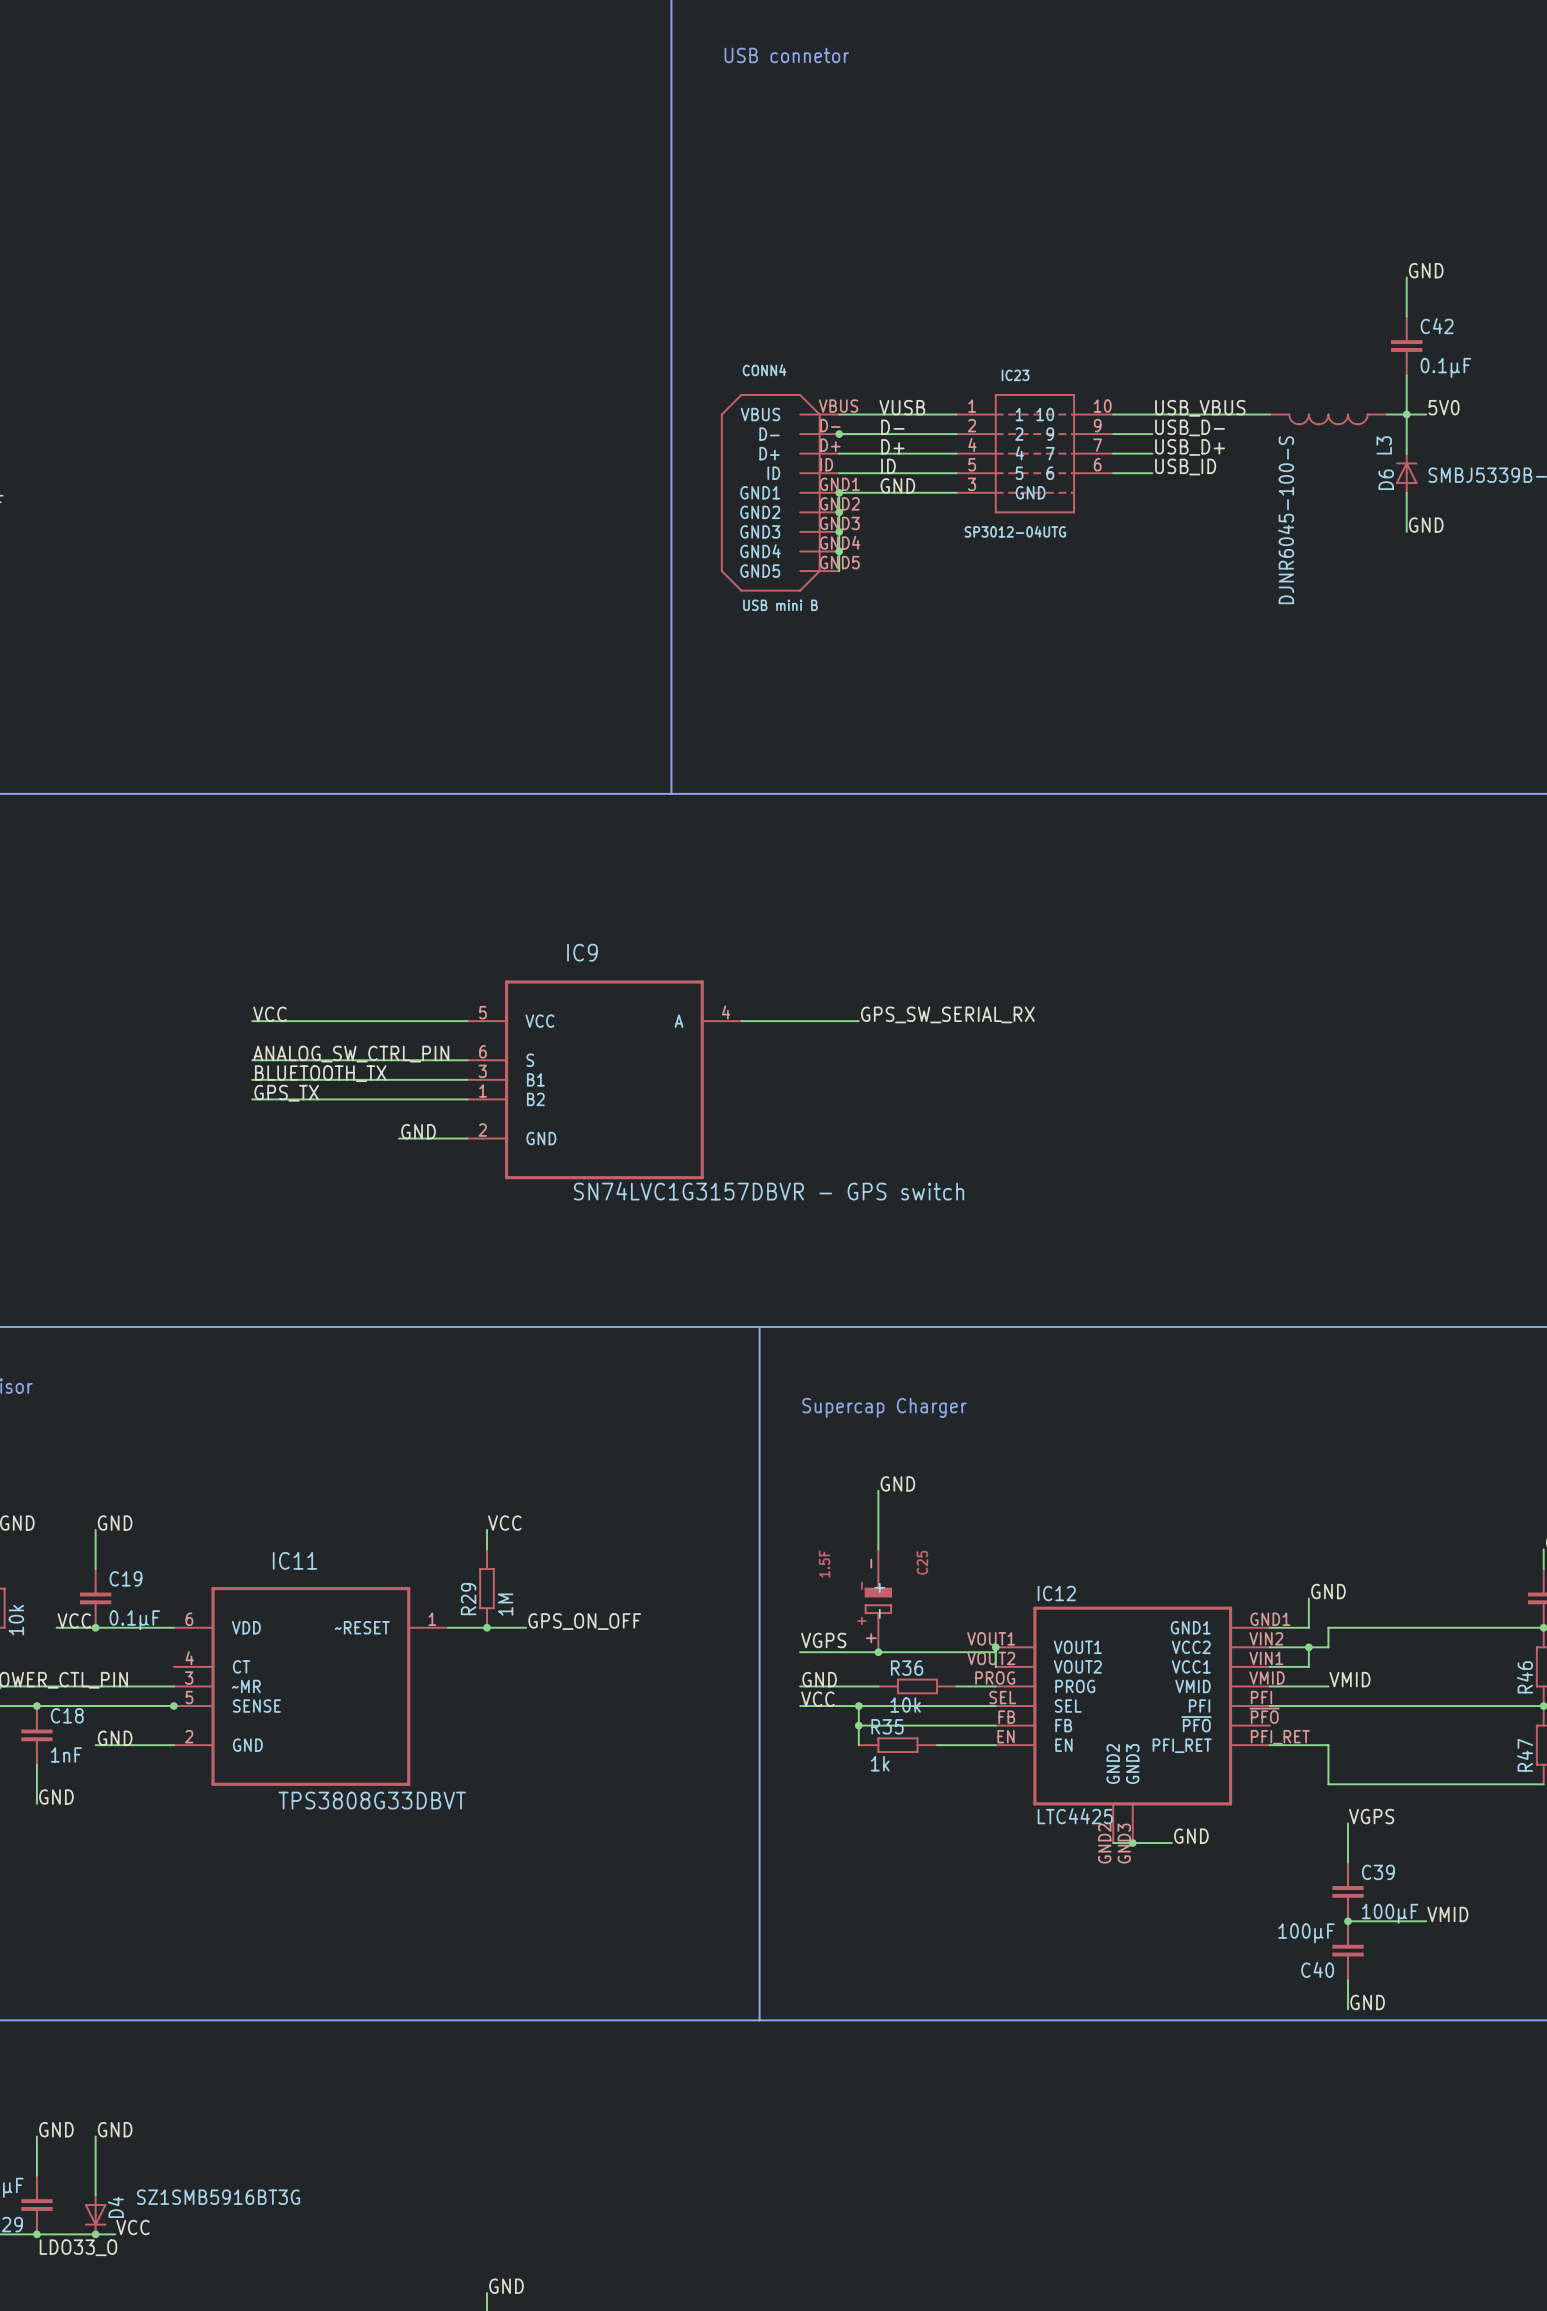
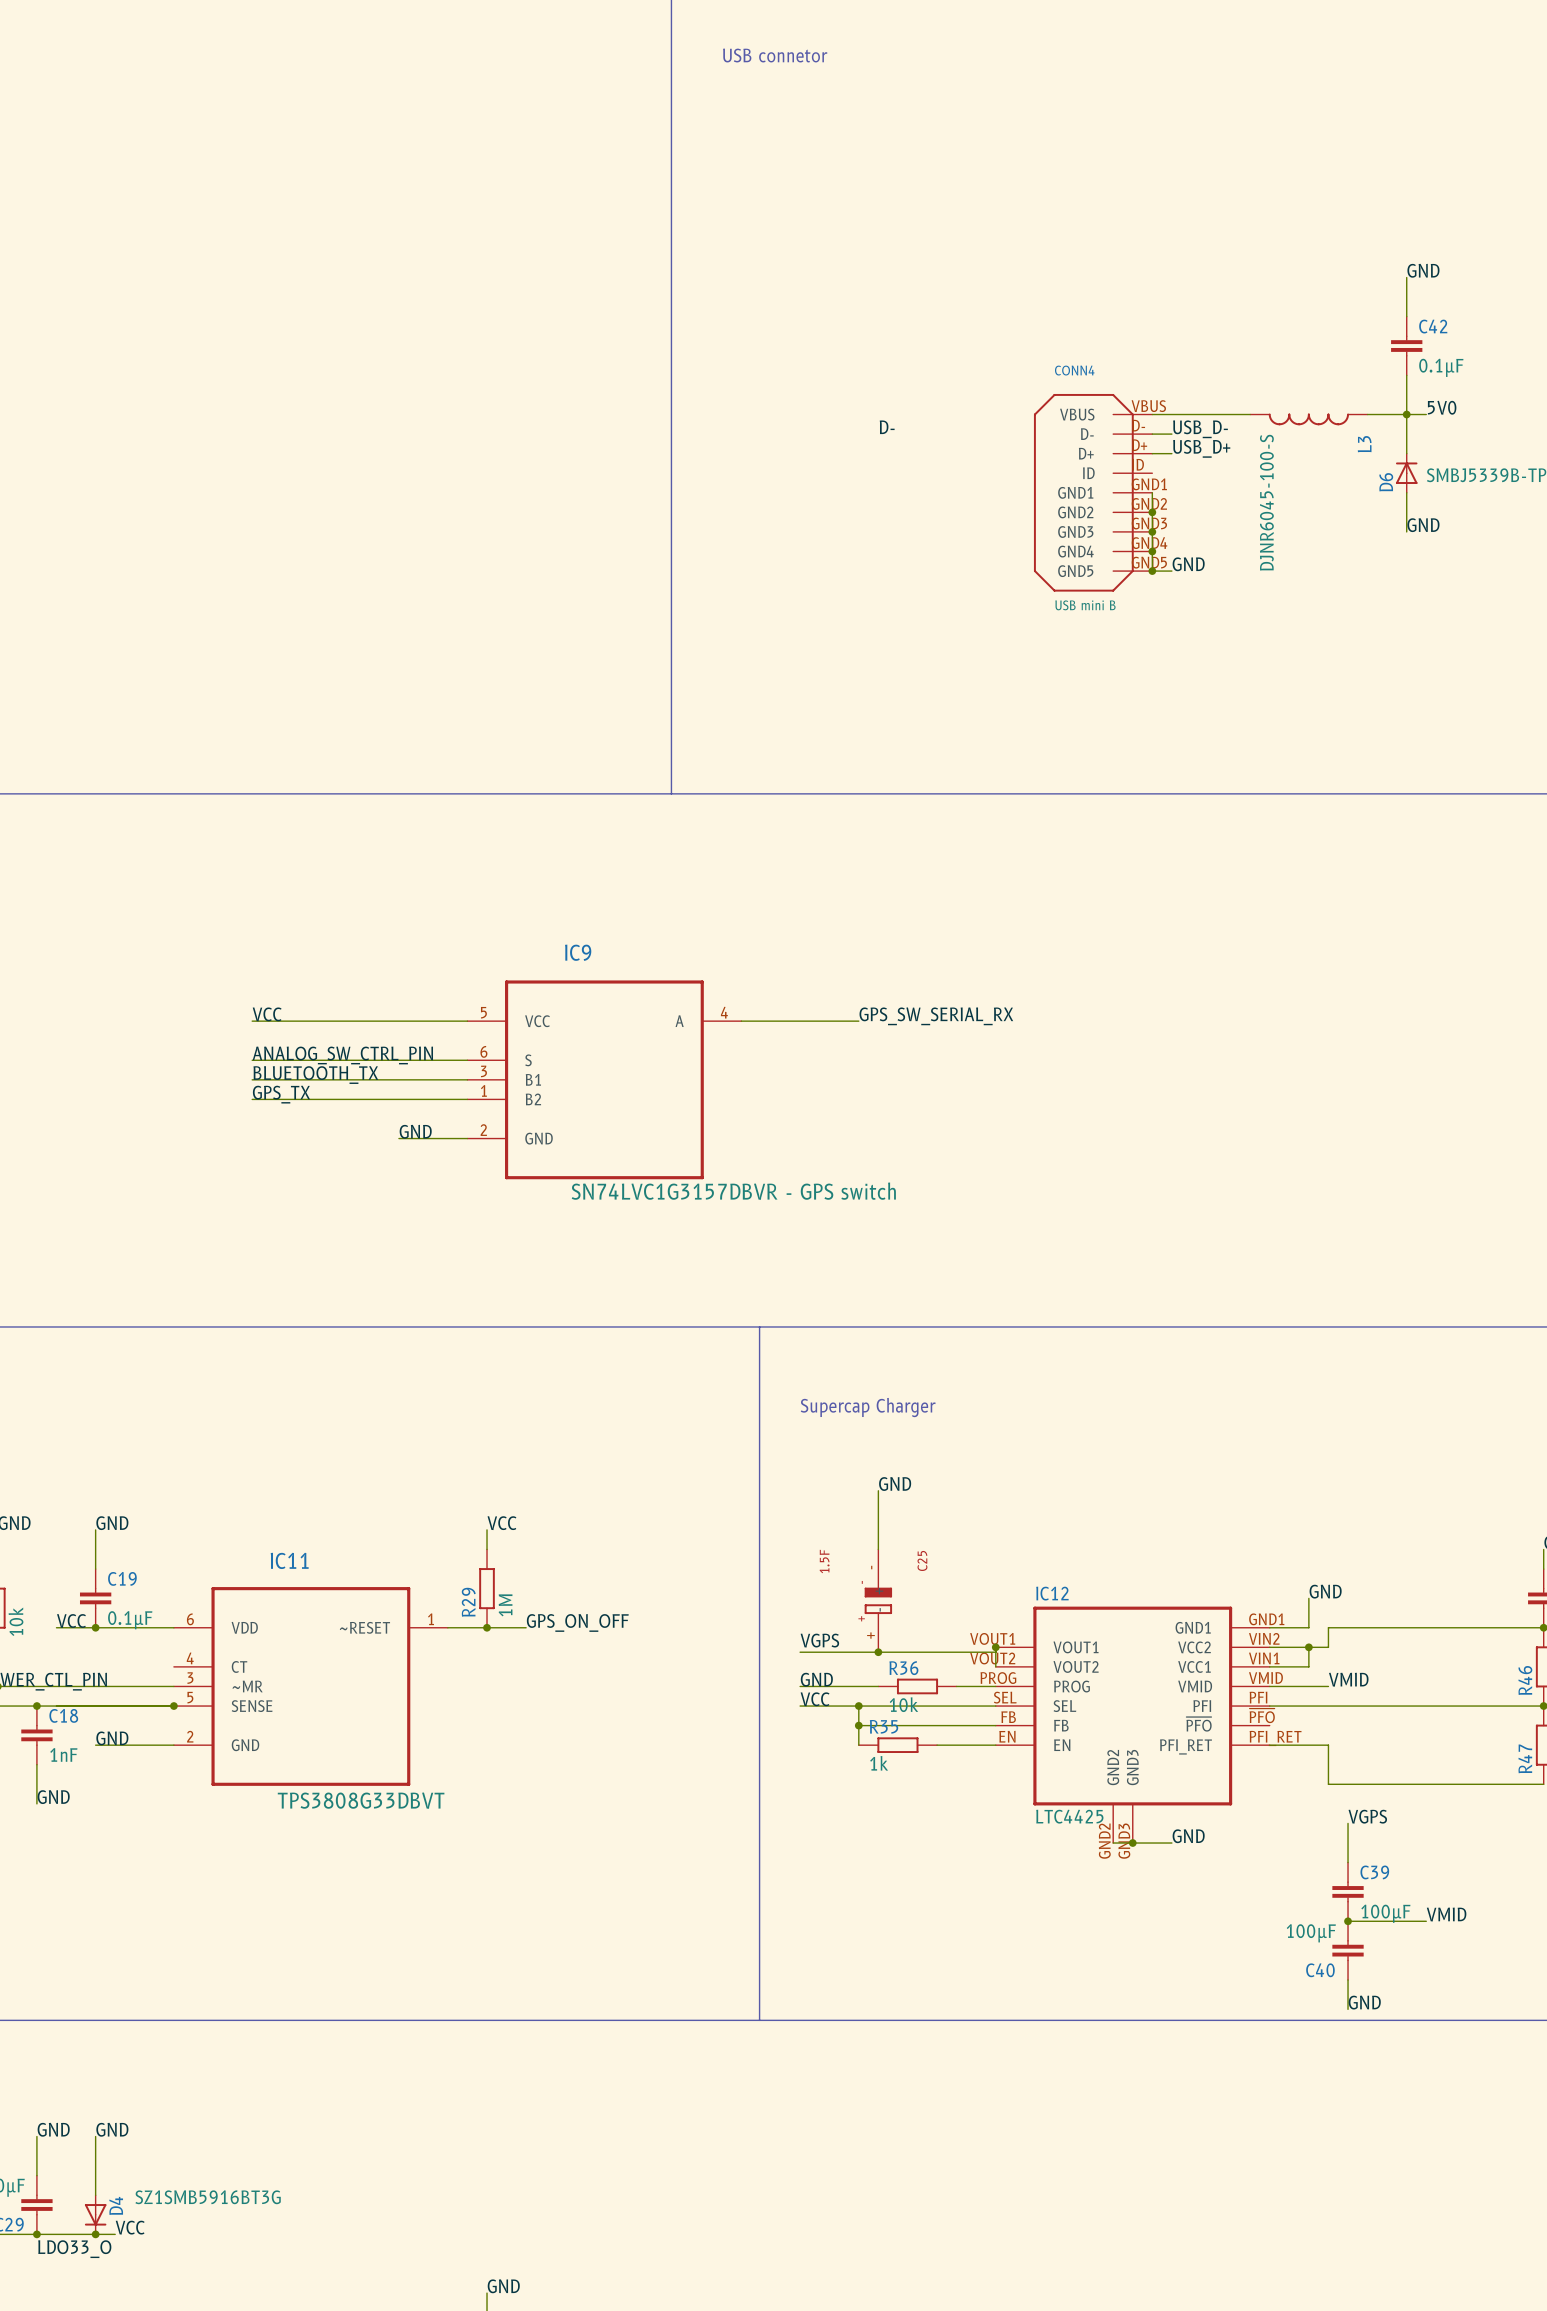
label: VUSB (902, 407) -> none
label: USB_VBUS (1200, 408) -> none
wire: (839, 414) (956, 414) -> none
L3 position: (1328, 419) -> (1308, 419)
label position: USB_D- (1190, 427) -> USB_D- (1200, 429)
wire: (839, 434) (956, 434) -> none
junction: (839, 434) -> none
label: D+ (892, 446) -> none
label position: USB_D+ (1190, 447) -> USB_D+ (1201, 448)
wire: (839, 453) (956, 453) -> none
IC23: SP3012-04UTG (1034, 453) -> none
label: ID (888, 466) -> none
label: USB_ID (1185, 467) -> none
wire: (839, 473) (956, 473) -> none
label: GND (897, 485) -> none
CONN4 position: (780, 492) -> (1093, 492)
junction: (839, 492) -> none
wire: (956, 492) (839, 492) (839, 571) -> none
wire: none -> (1152, 492) (1152, 571) (1171, 571)
junction: (839, 512) -> none
junction: none -> (1152, 512)
junction: (839, 531) -> none
junction: none -> (1152, 531)
junction: (839, 551) -> none
junction: none -> (1152, 551)
label: none -> GND (1188, 564)
junction: none -> (1152, 571)

